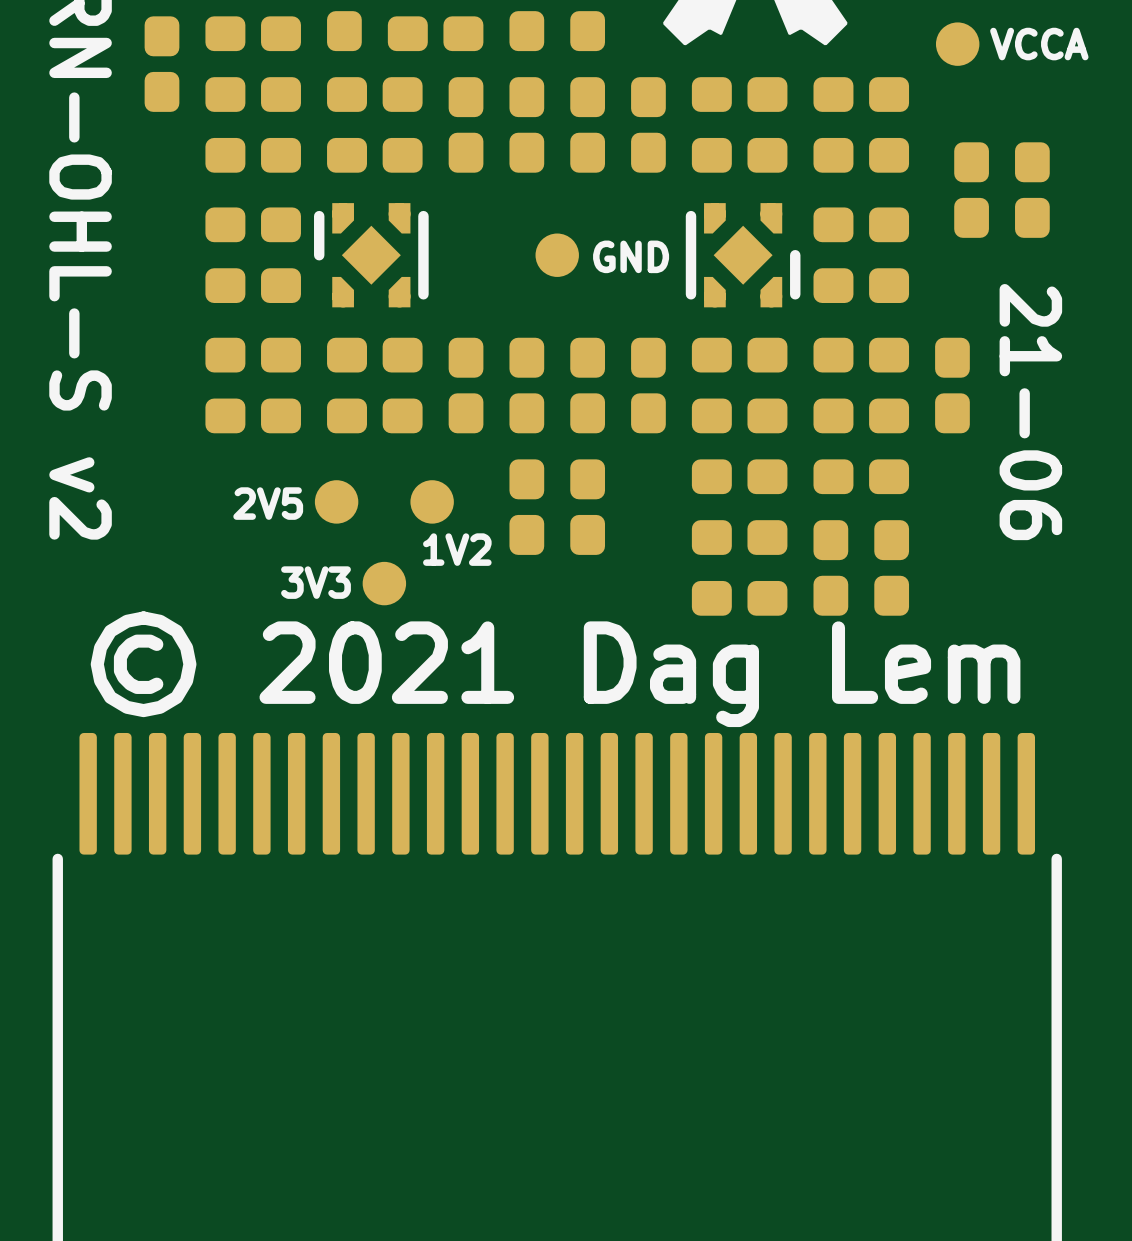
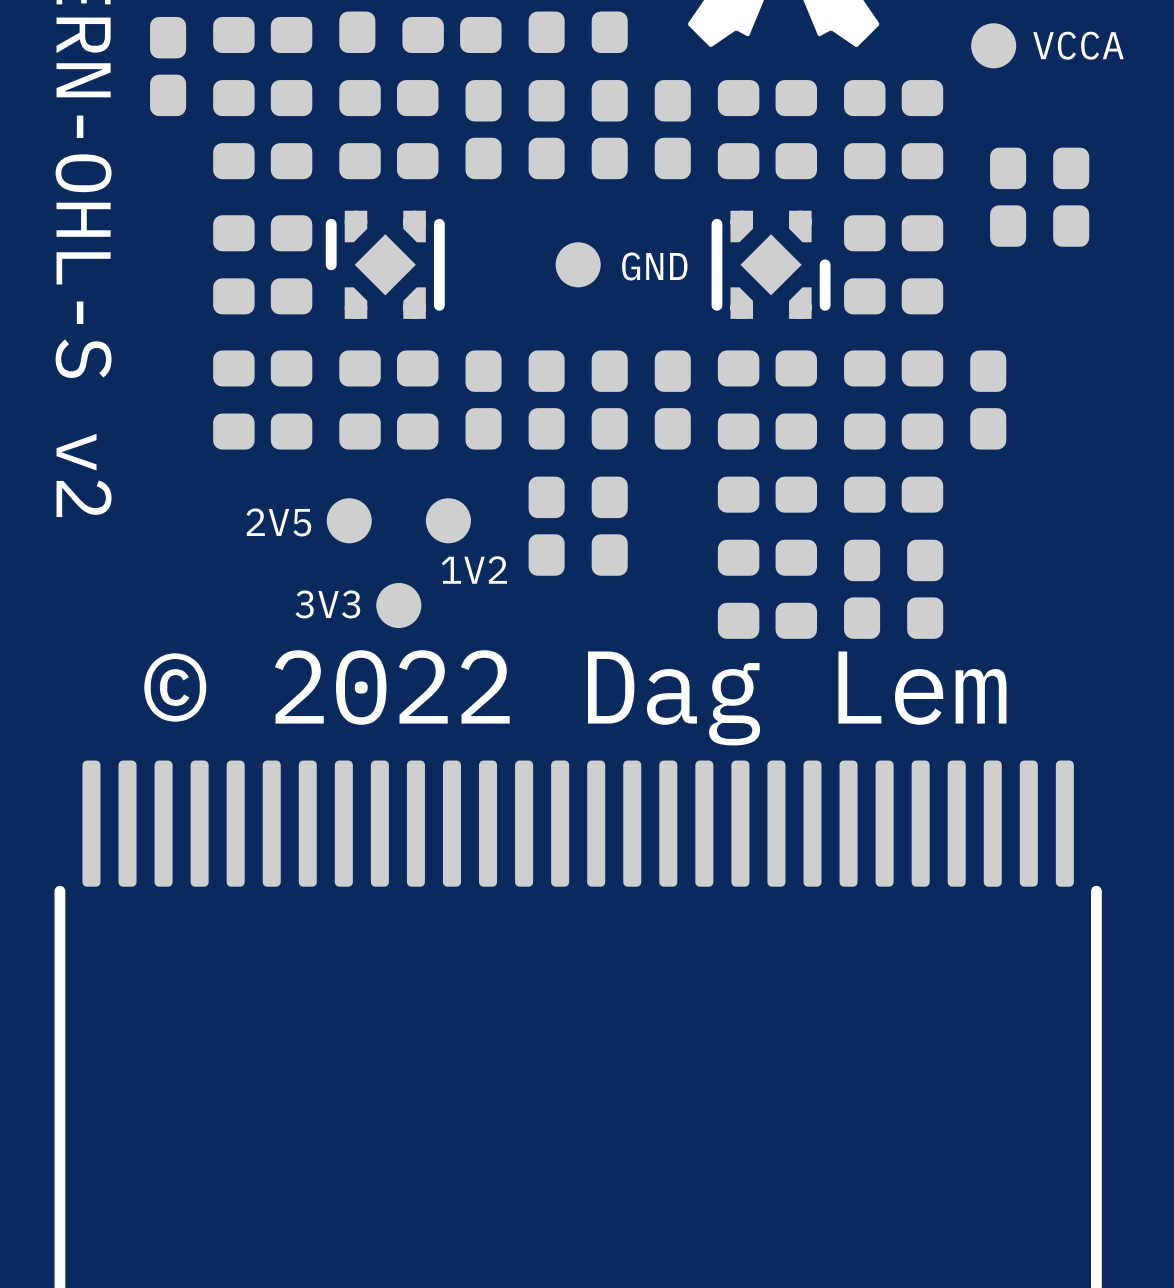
text: 21-06 (1030, 412) -> none
text: © 2021 Dag Lem (555, 669) -> © 2022 Dag Lem (575, 697)

